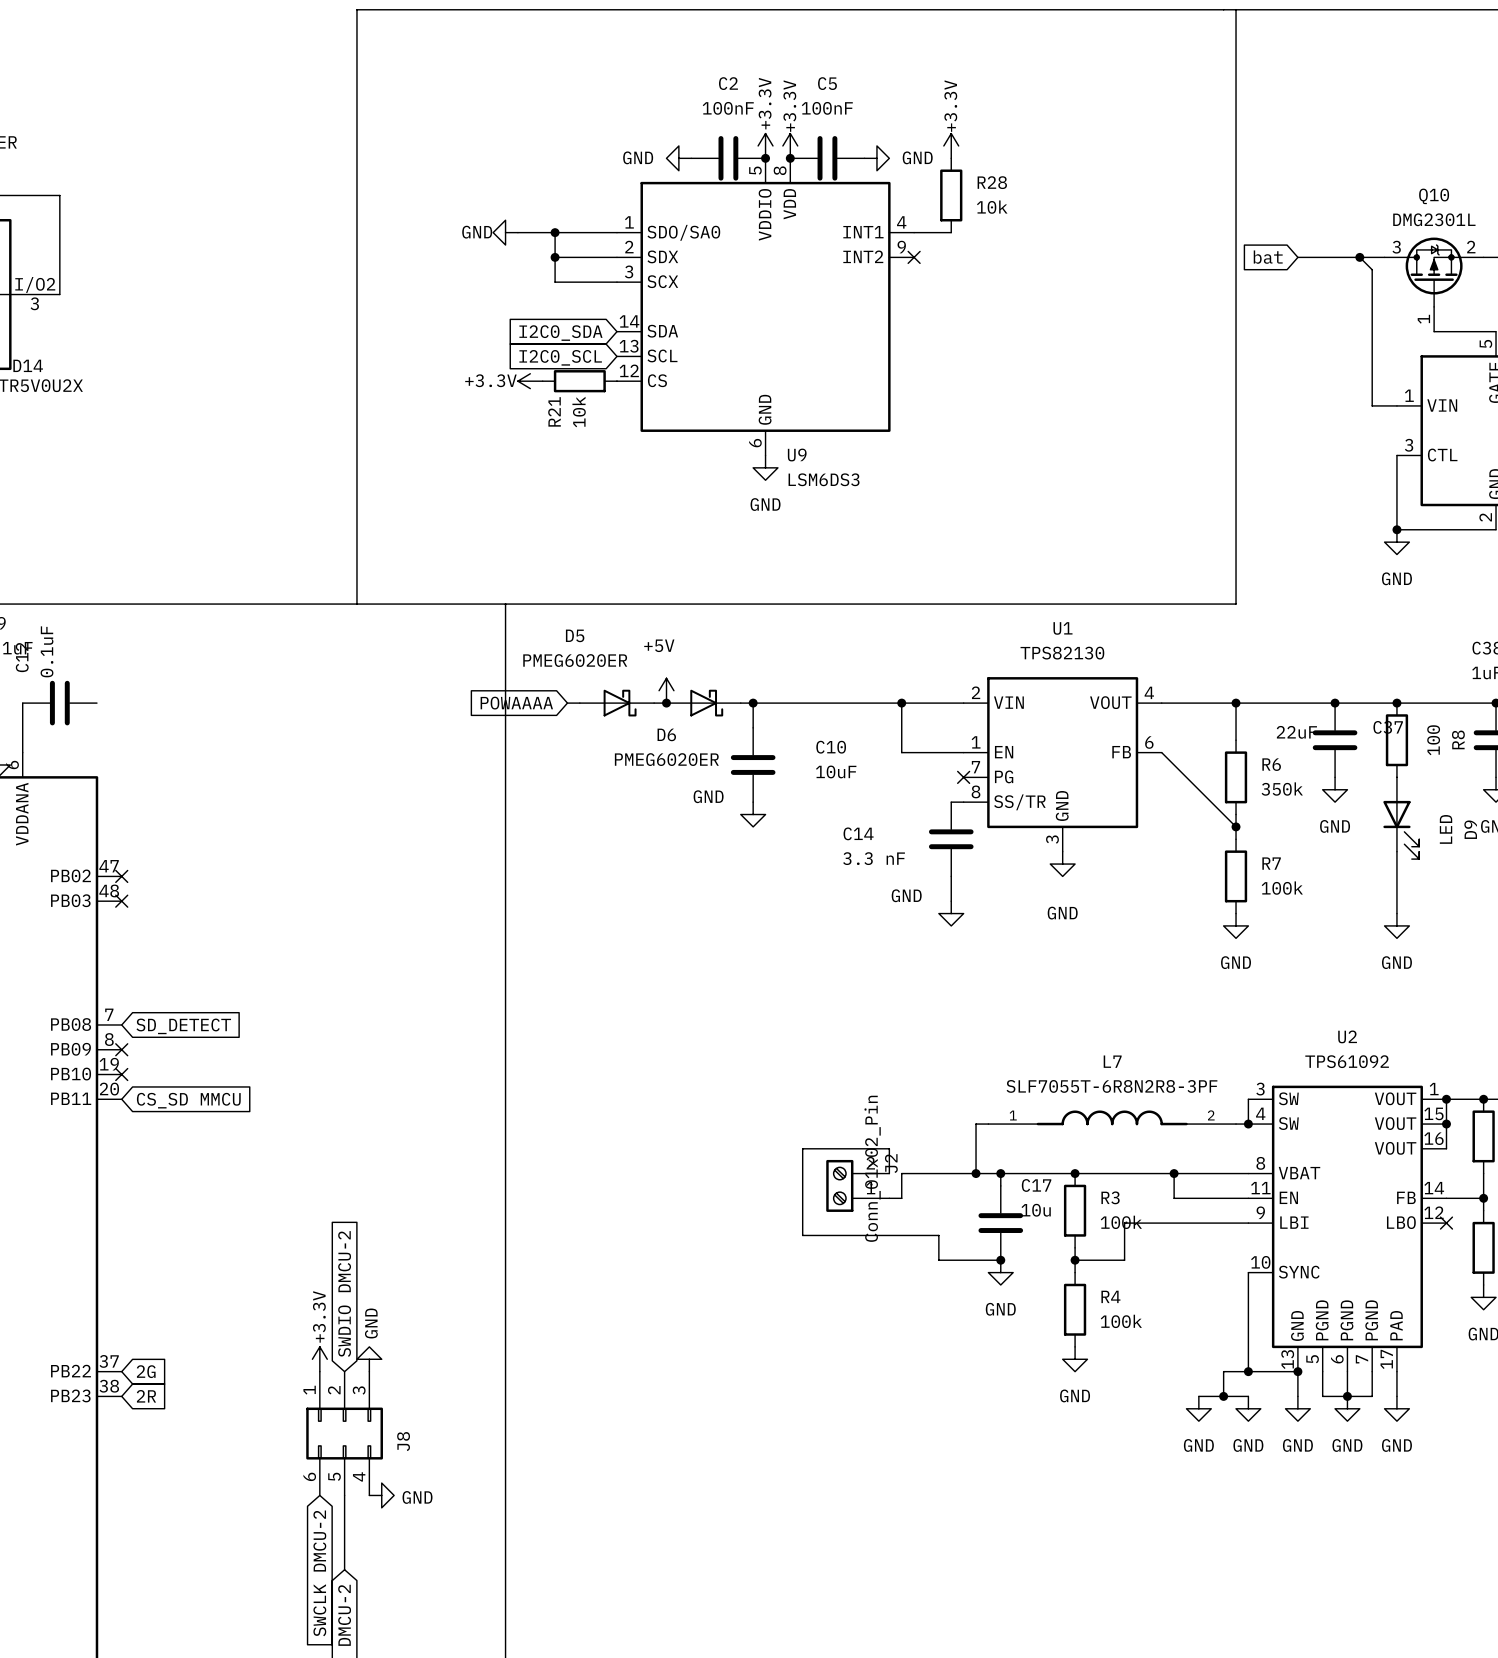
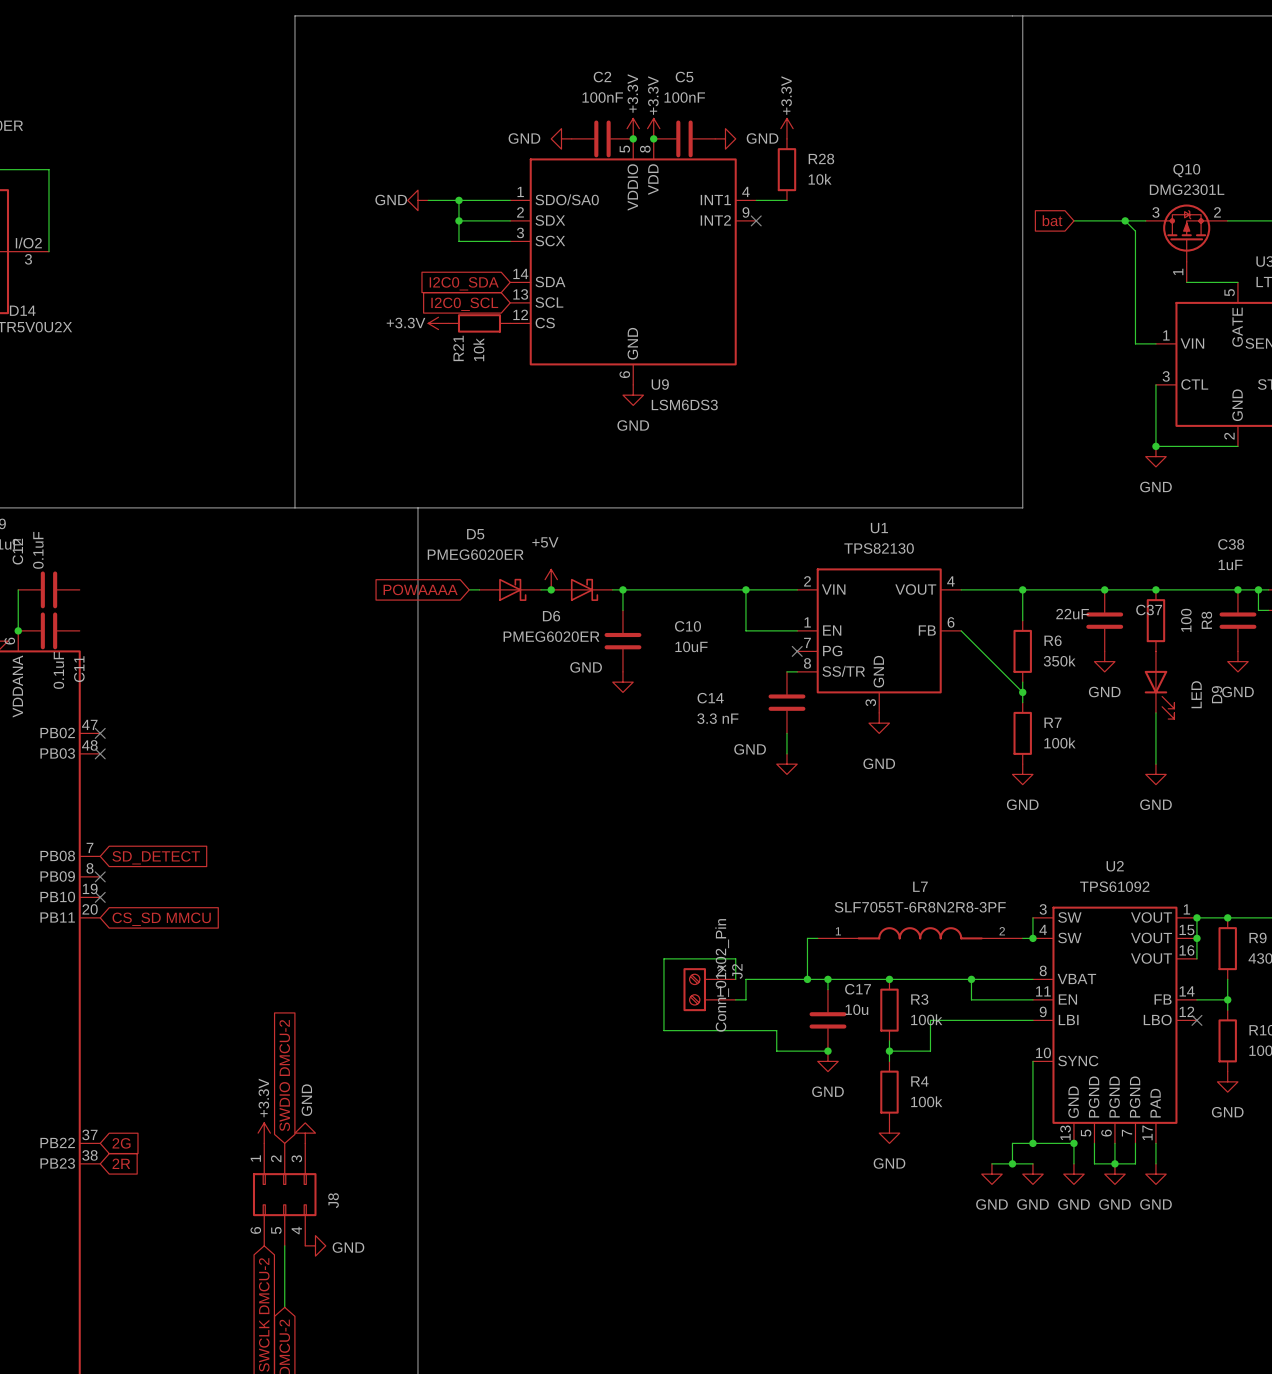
junction: none -> (18, 630)
C11: none -> 0.1uF (48, 630)

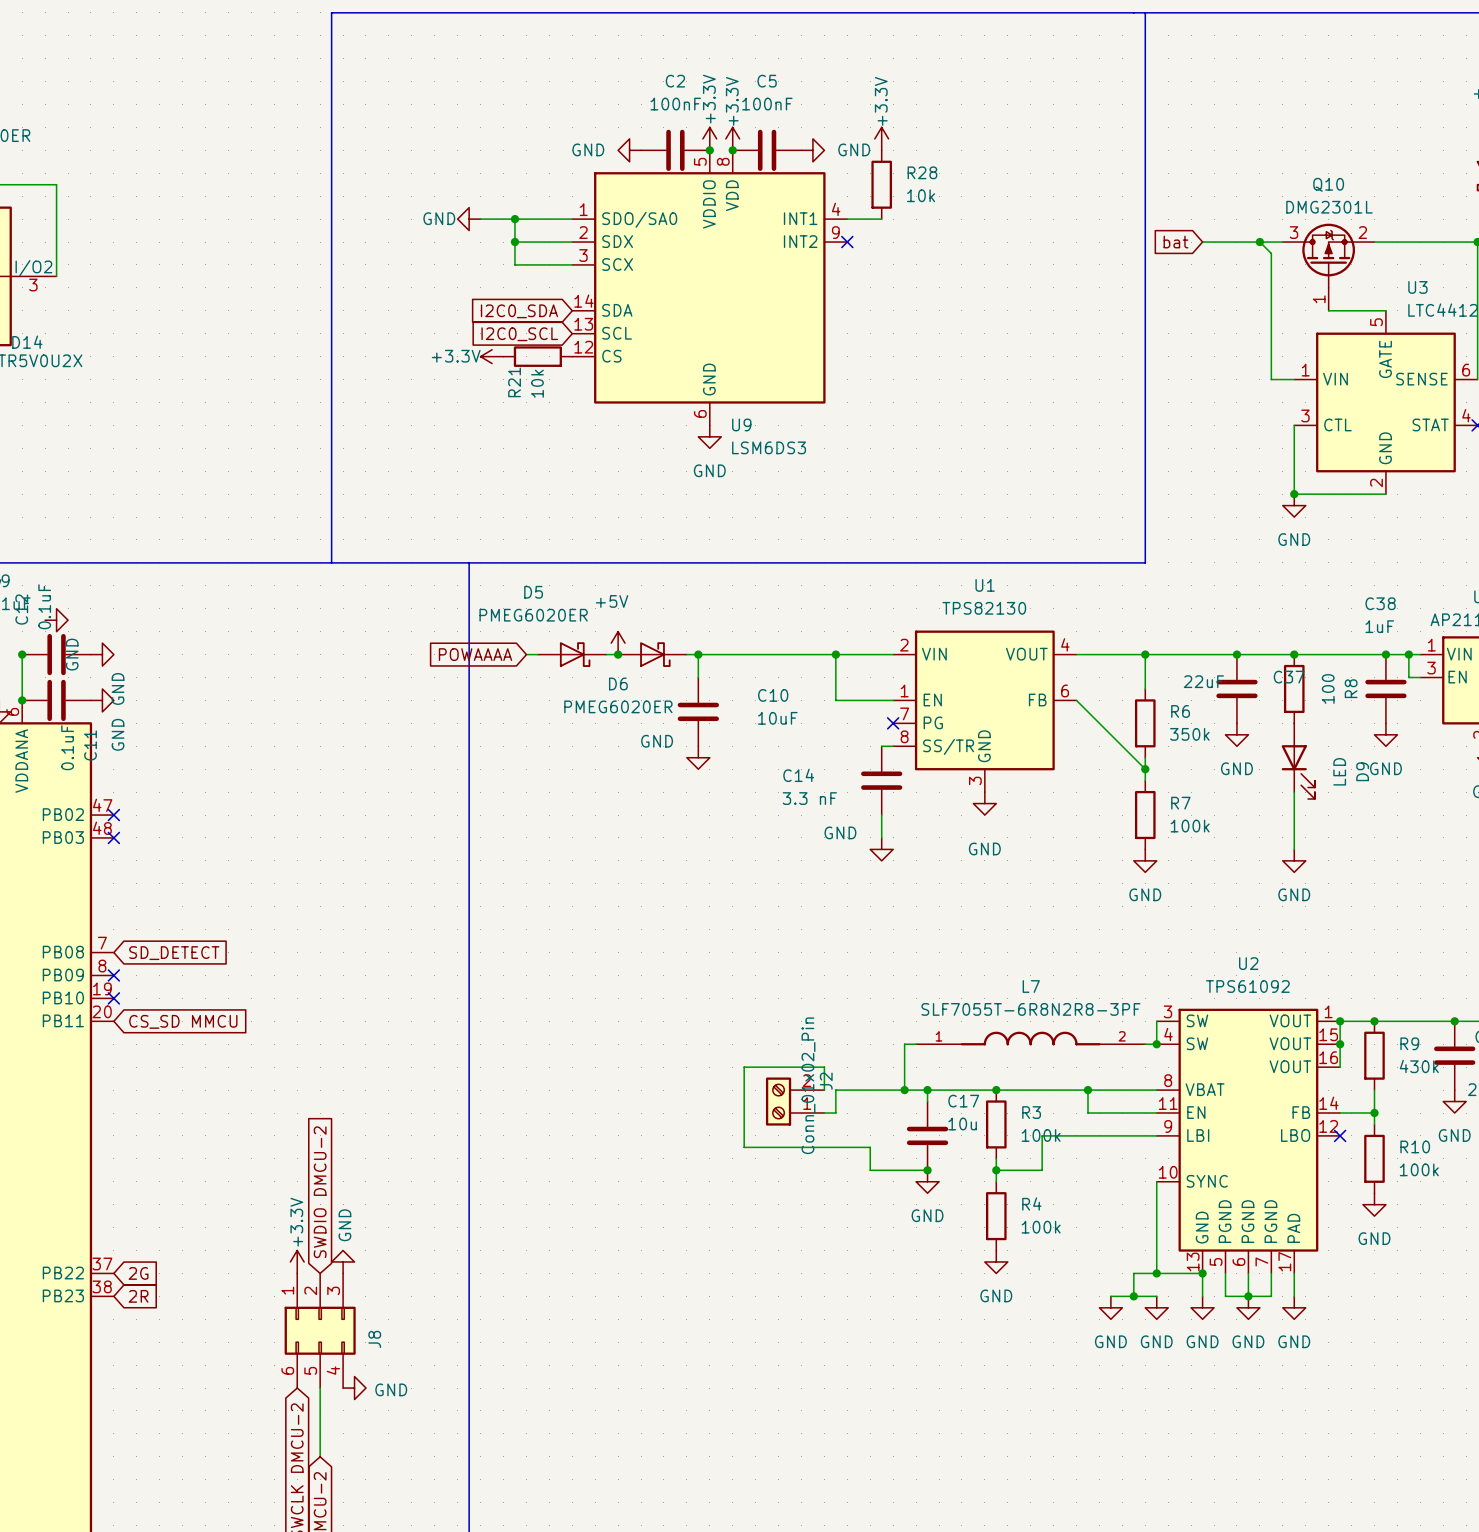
power symbol: none -> GND (56, 620)
junction: none -> (22, 654)
power symbol: none -> GND (102, 654)
power symbol: none -> GND (102, 700)

